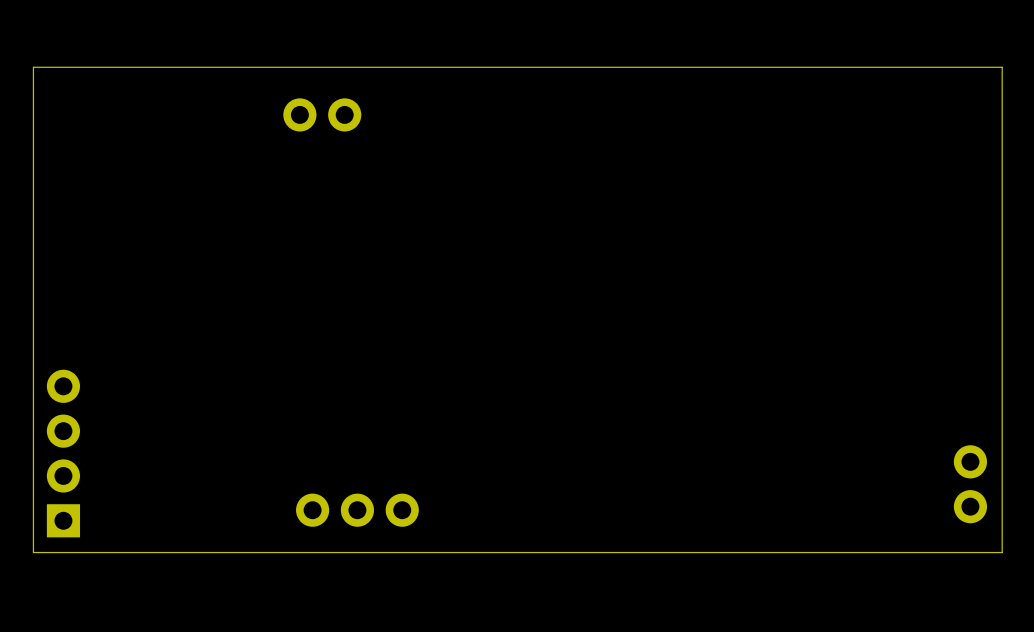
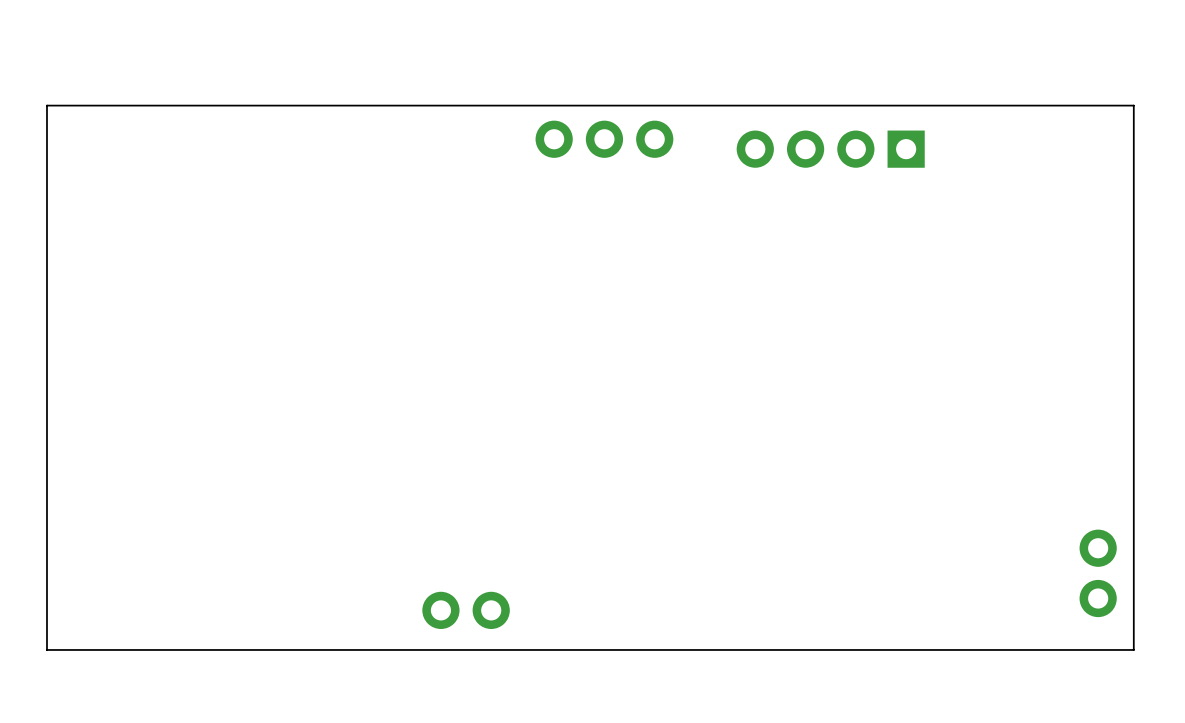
part: none -> (604, 139)
part: none -> (830, 149)
part position: (322, 114) -> (466, 610)
part: (63, 453) -> none
part: (357, 510) -> none

